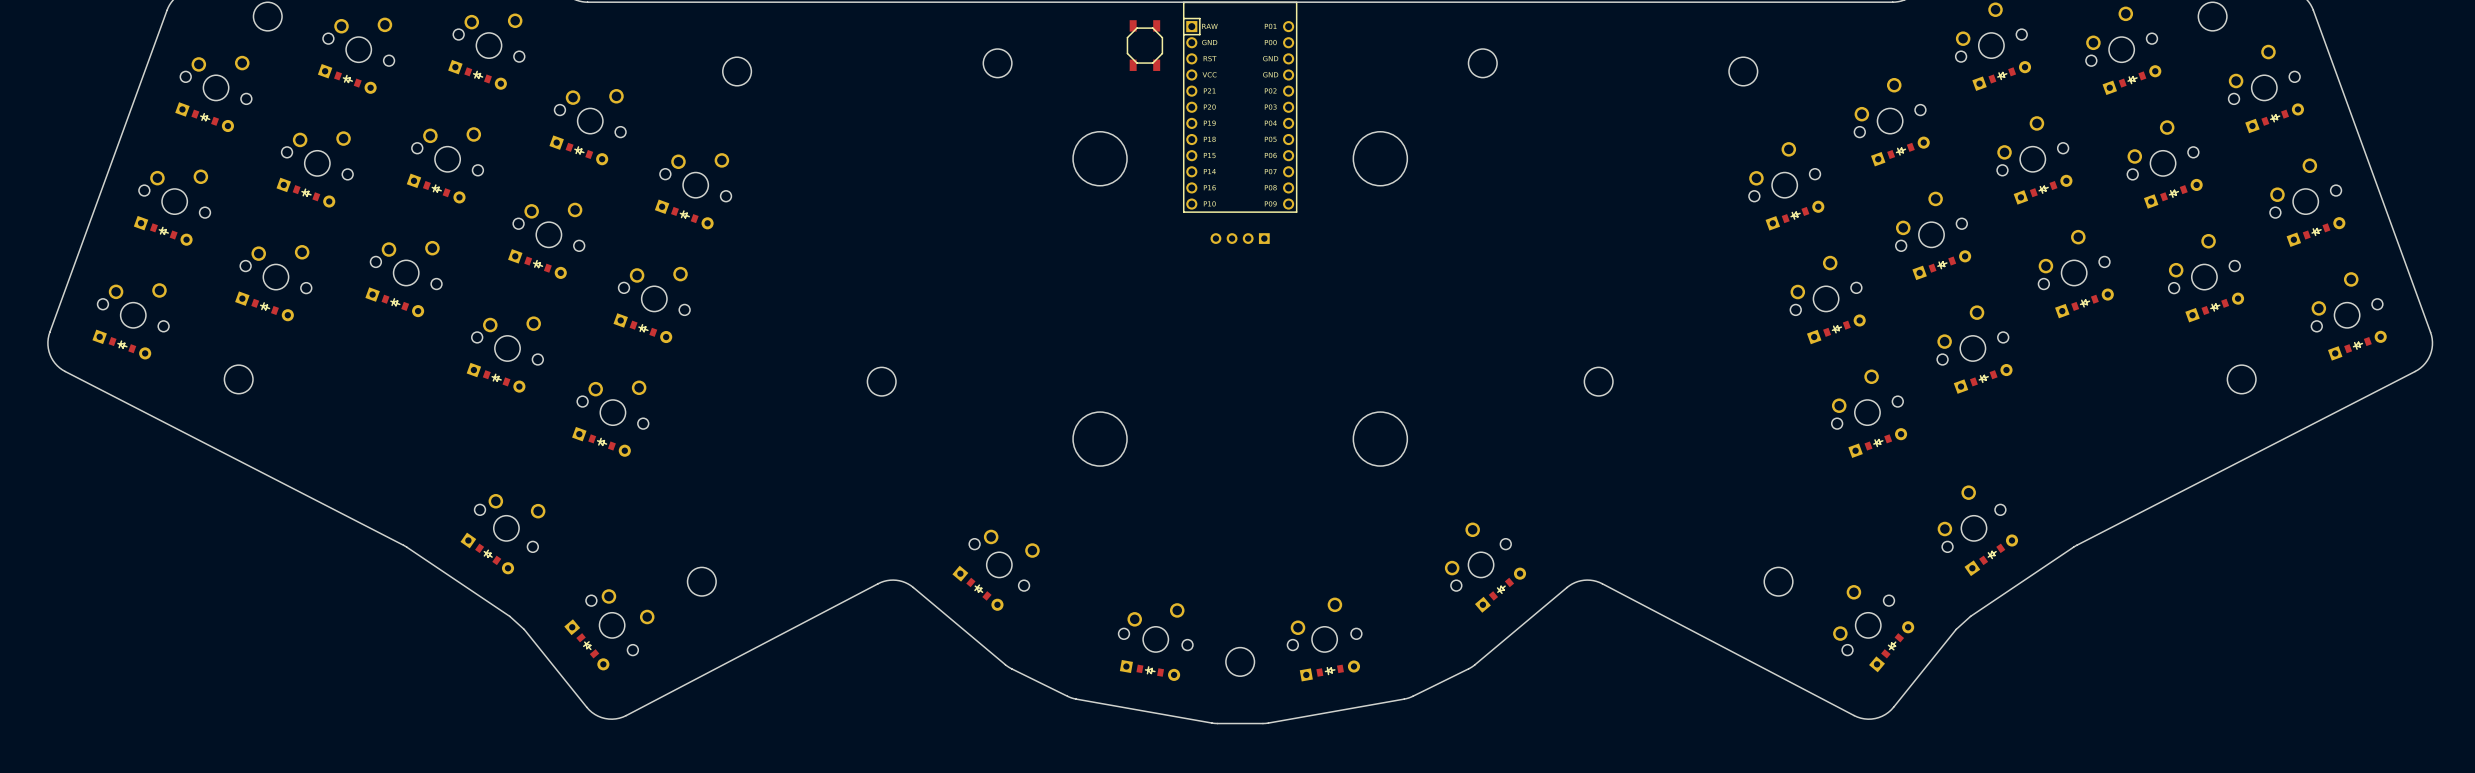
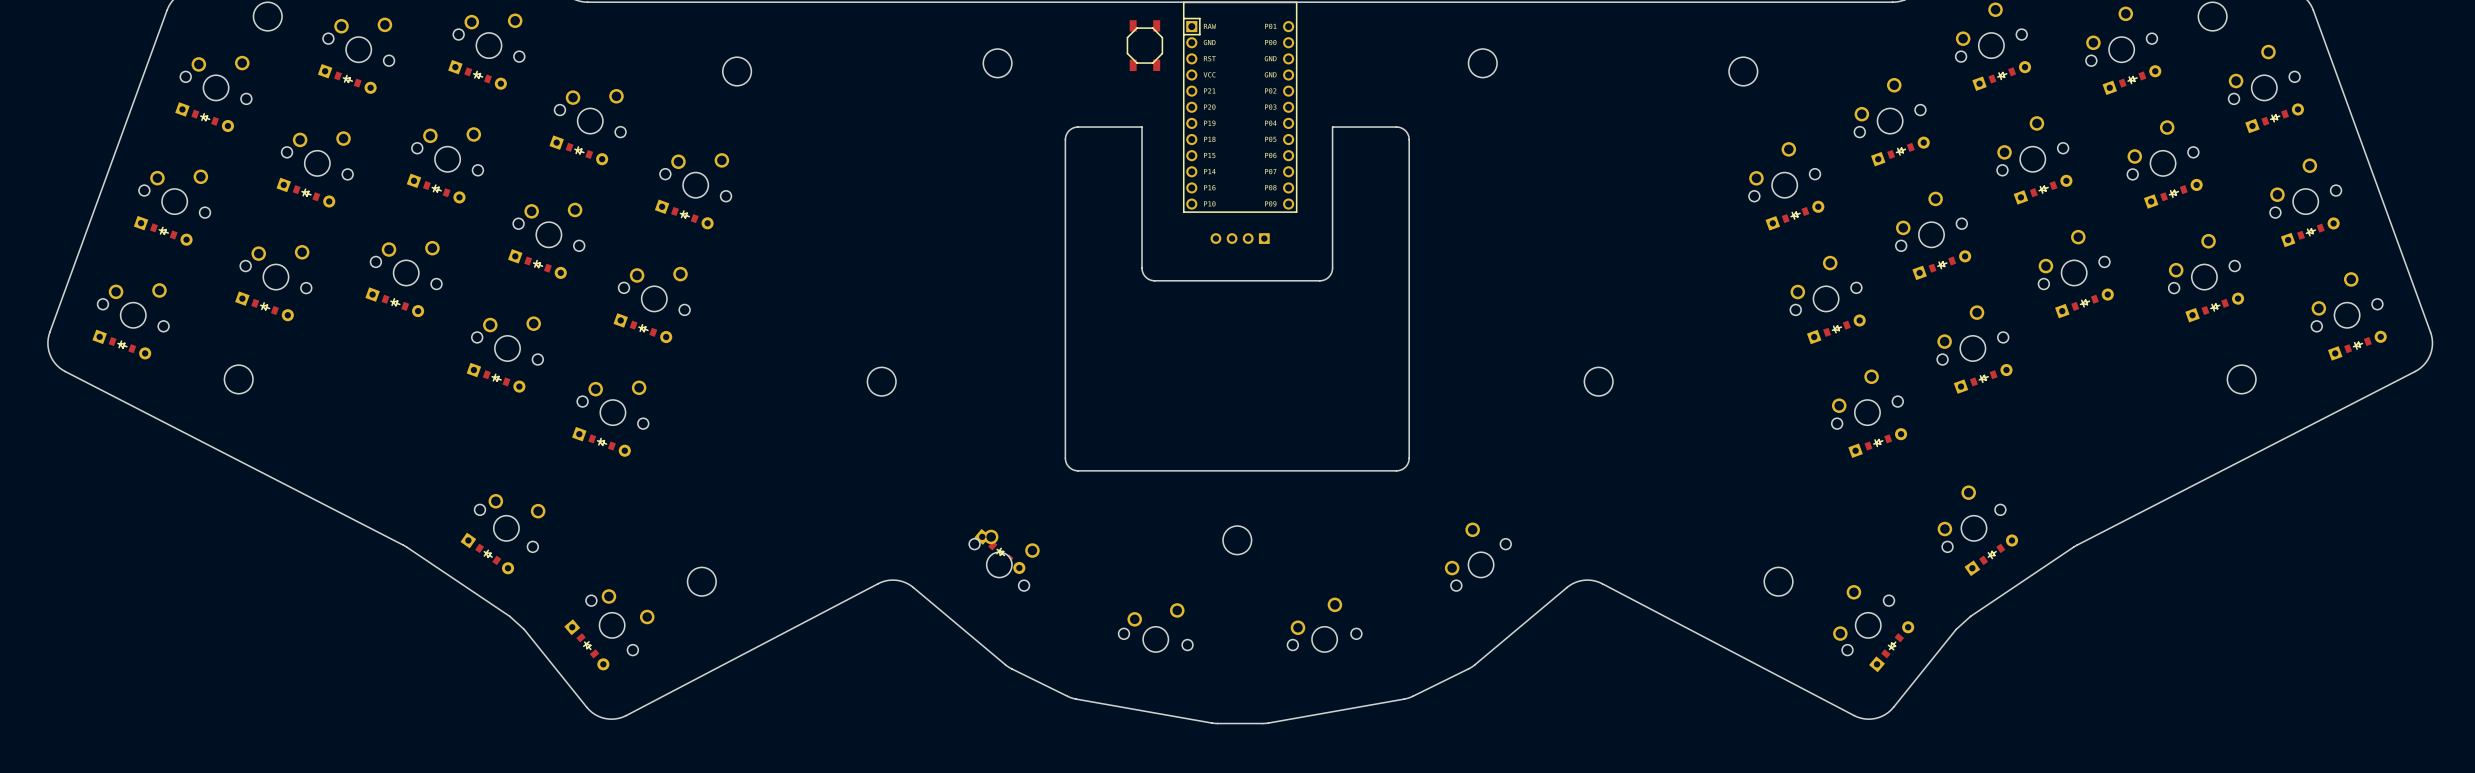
board edge: none -> (1078, 127) (1142, 127) (1142, 269) (1145, 277) (1154, 280) (1319, 280) (1326, 279) (1330, 274) (1332, 268) (1332, 127) (1396, 127) (1405, 130) (1409, 139) (1409, 458) (1405, 467) (1396, 470) (1078, 470) (1069, 467) (1065, 458) (1065, 139) (1069, 130) (1078, 127)
round board edge: [1072, 131, 1128, 187] -> none
round board edge: [1352, 131, 1408, 187] -> none
part footprint: [2286, 217, 2346, 247] -> [2280, 217, 2340, 248]
round board edge: [1072, 411, 1128, 467] -> none
round board edge: [1352, 411, 1408, 467] -> none
part position: (977, 588) -> (999, 551)
part: (1500, 590) -> none
round board edge position: (1240, 661) -> (1237, 540)
part: (1150, 670) -> none
part: (1329, 670) -> none

